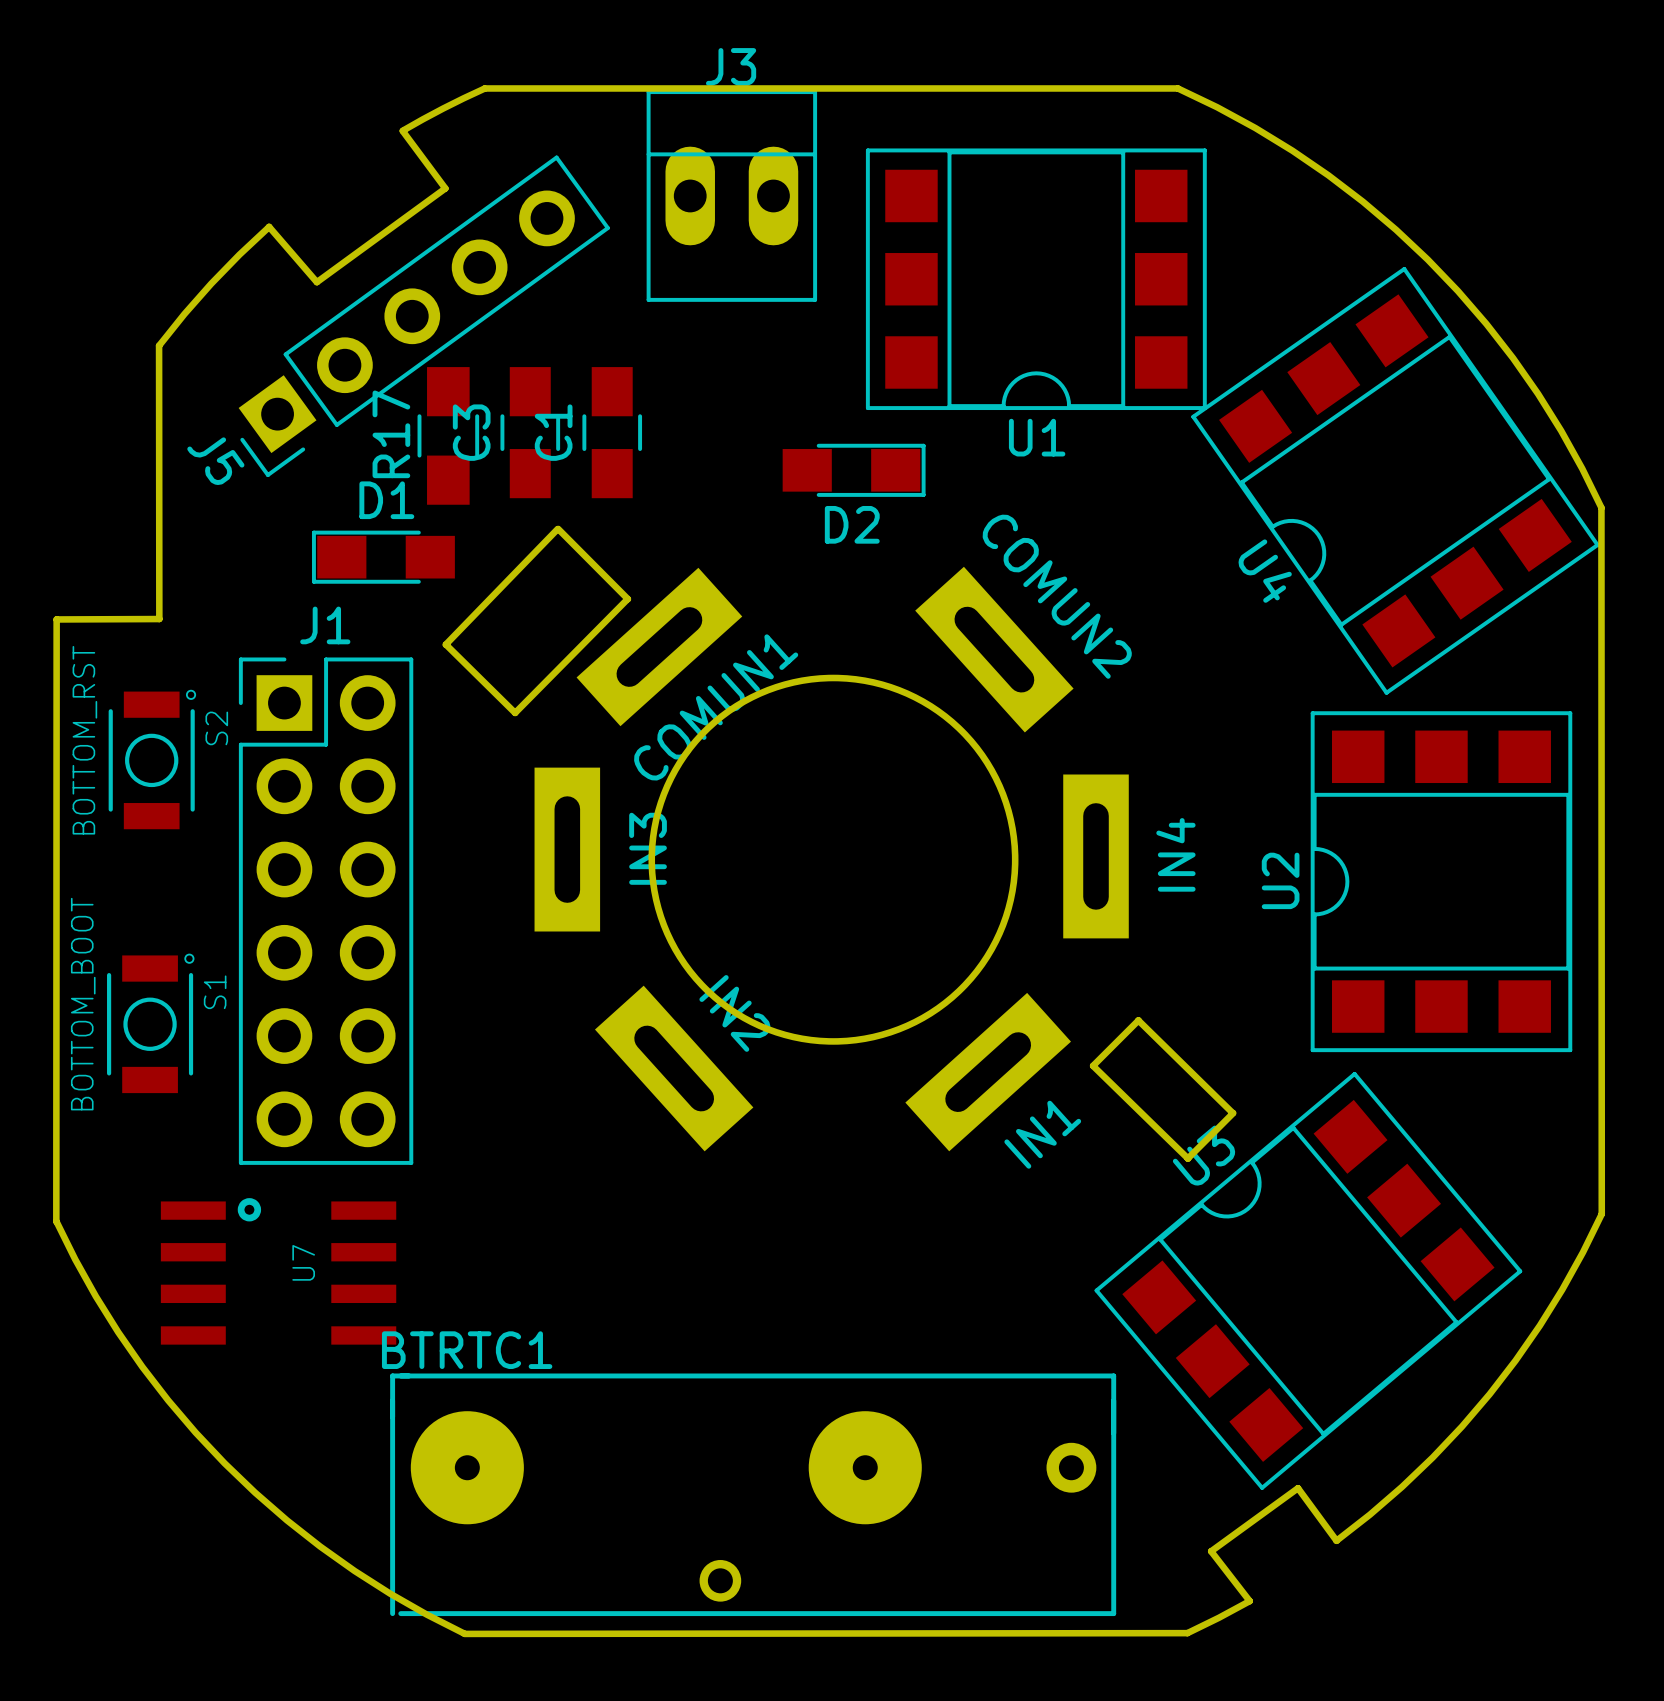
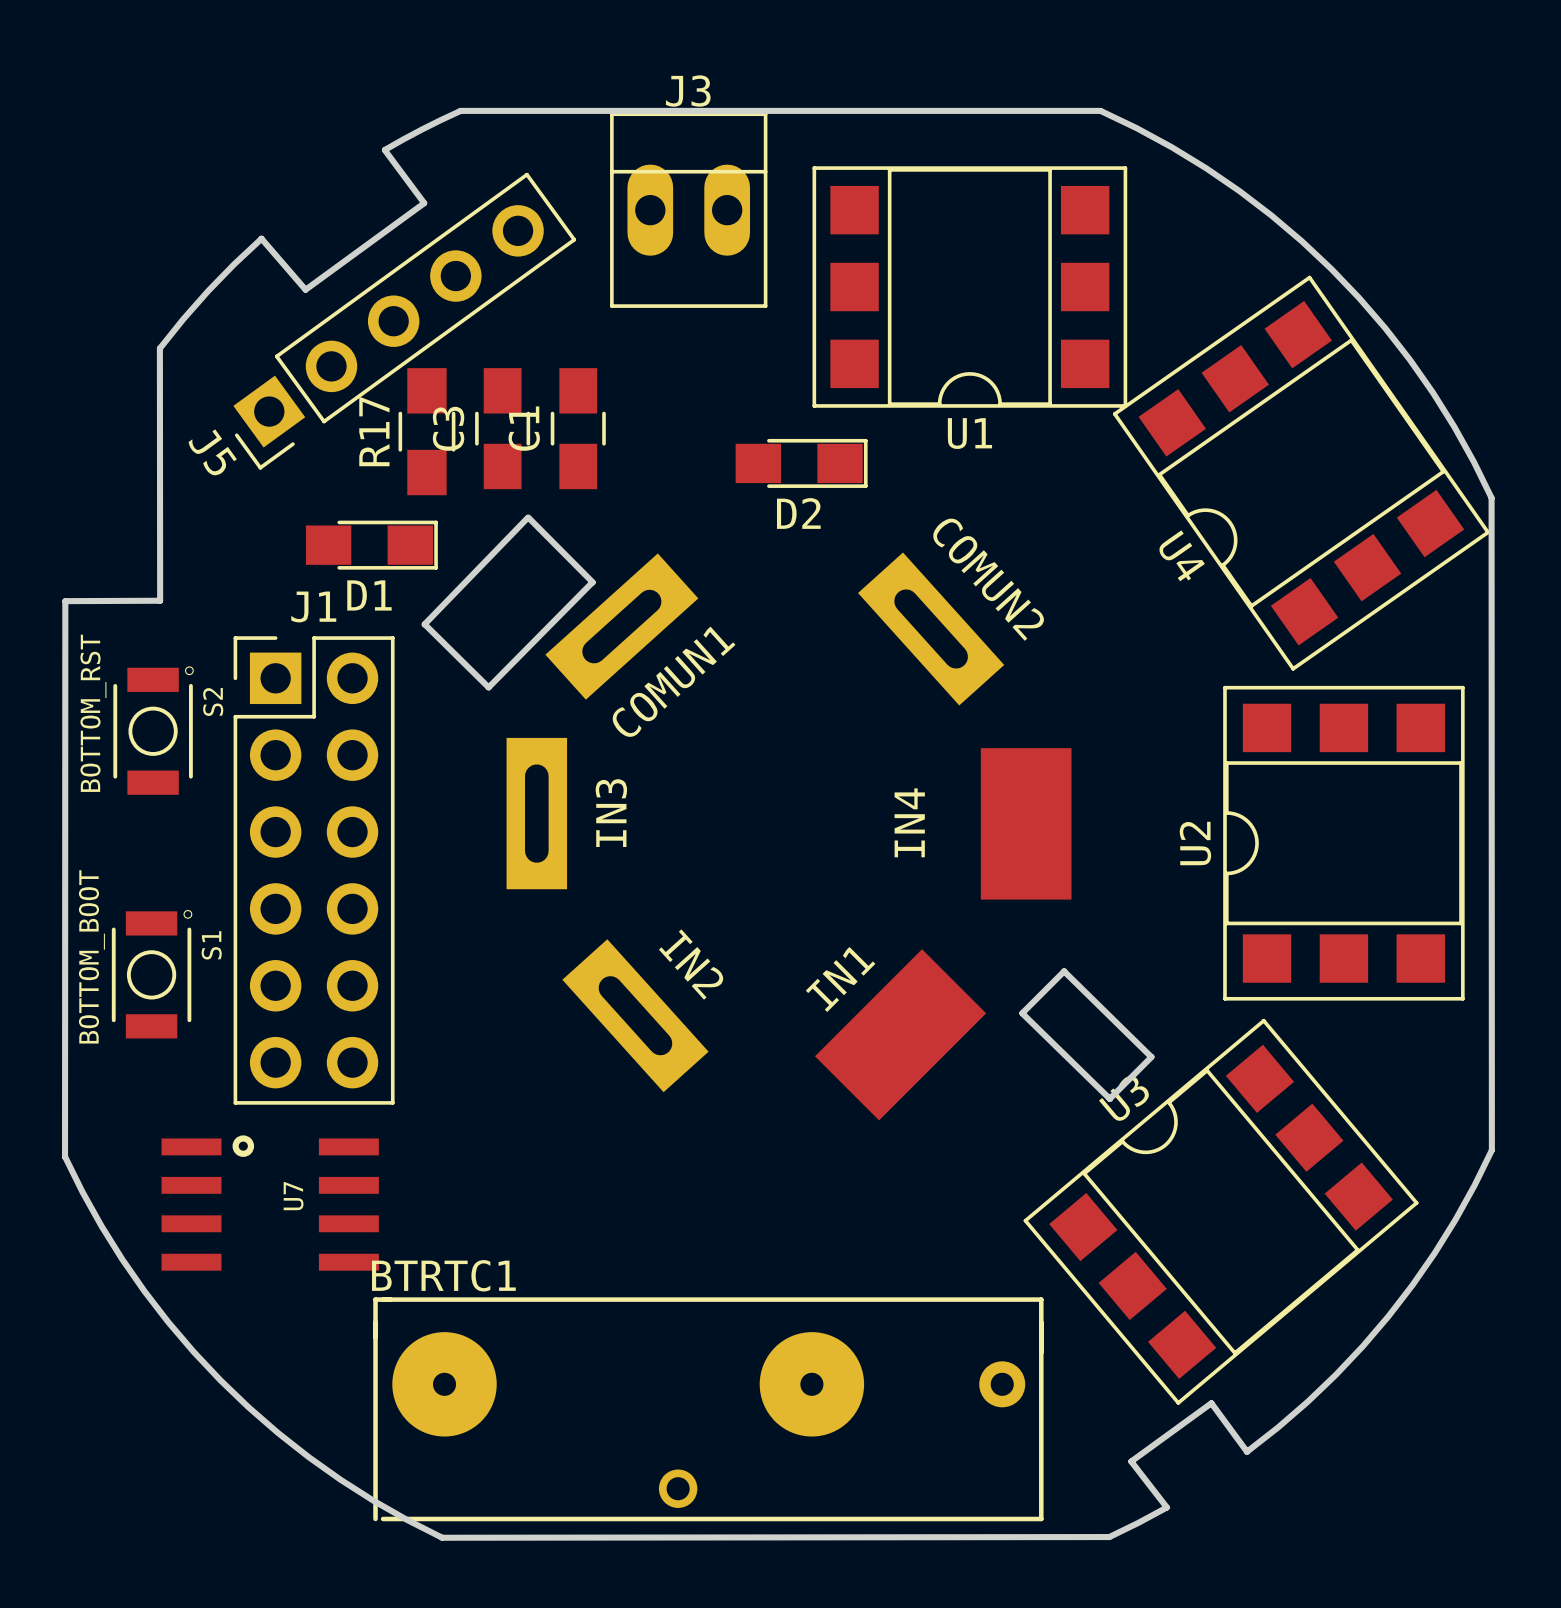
D1 rotation: 0° (383, 557) -> 180° (371, 545)
round board edge: [648, 674, 1019, 1045] -> none
IN4 footprint: [1063, 774, 1129, 939] -> [980, 748, 1072, 900]
IN4 name position: IN4 (1175, 854) -> IN4 (909, 822)
IN1 footprint: [905, 992, 1072, 1152] -> [814, 949, 987, 1121]
IN1 name position: IN1 (1042, 1134) -> IN1 (840, 979)

